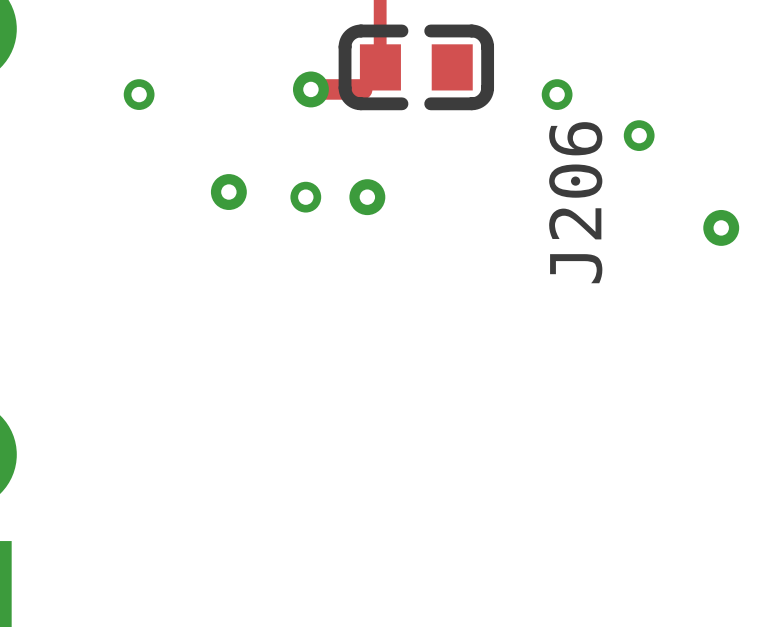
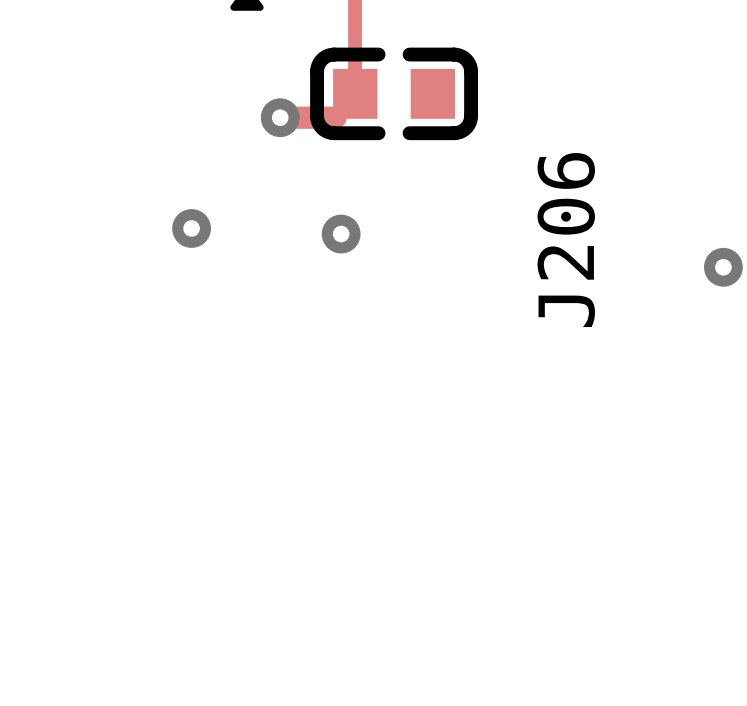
via: (139, 94) -> none
via: (557, 94) -> none
via: (639, 135) -> none
via: (305, 197) -> none

